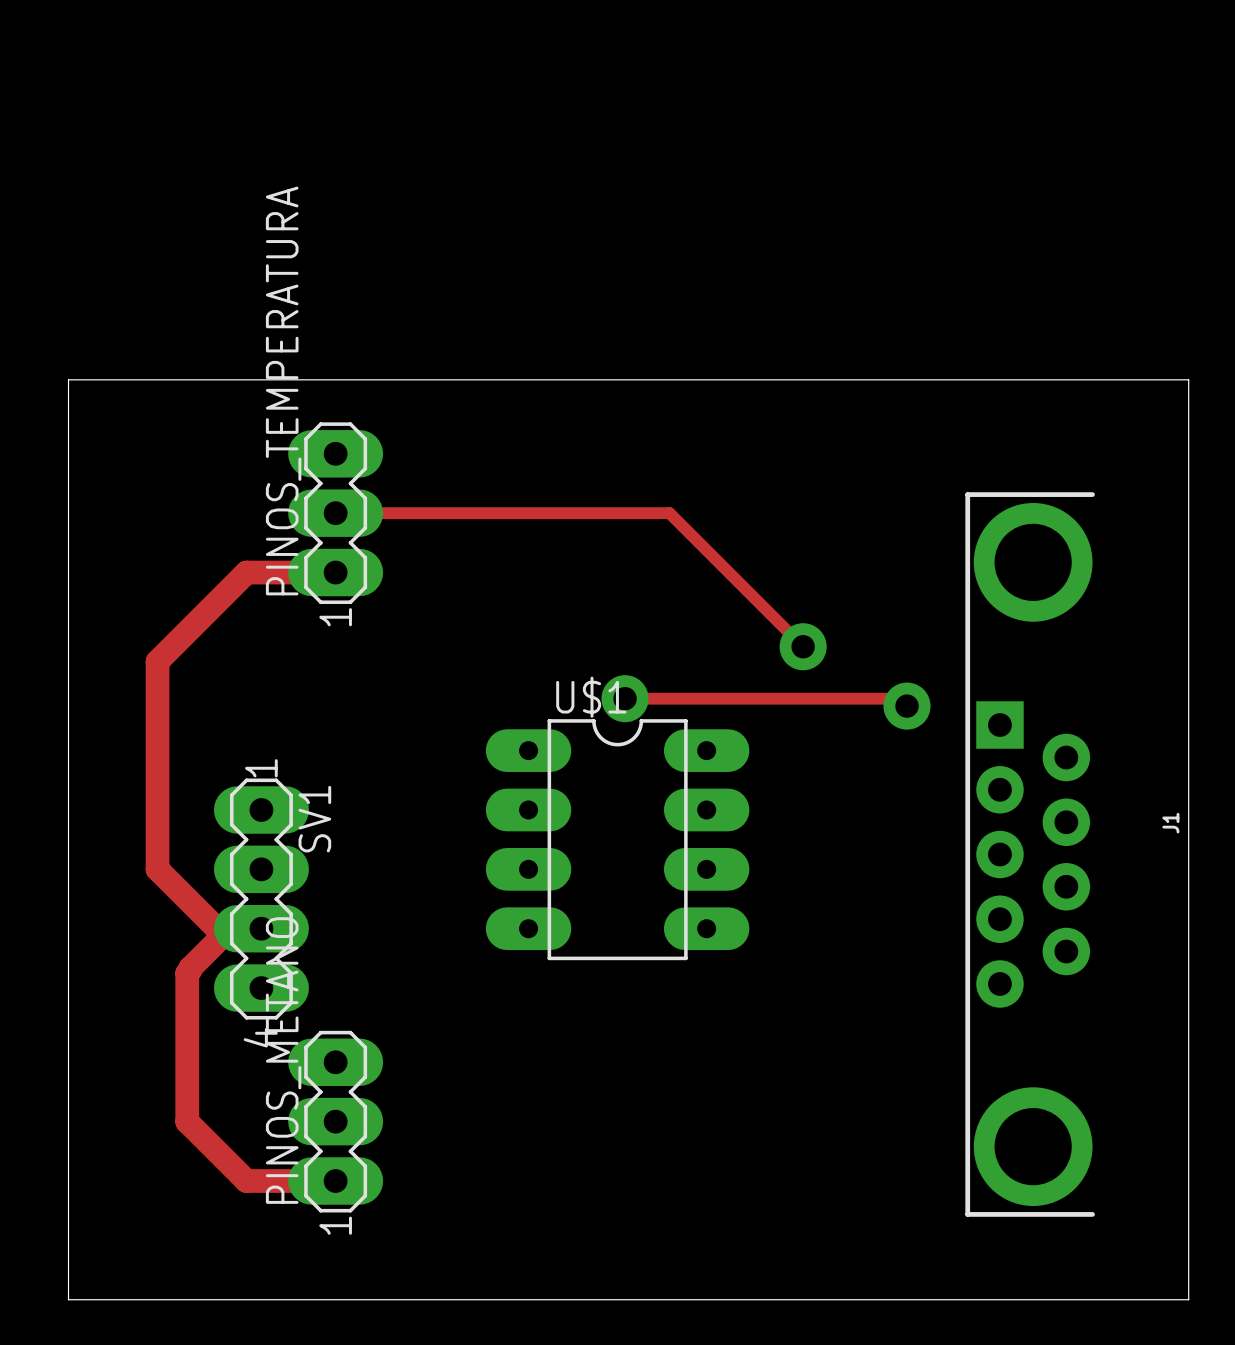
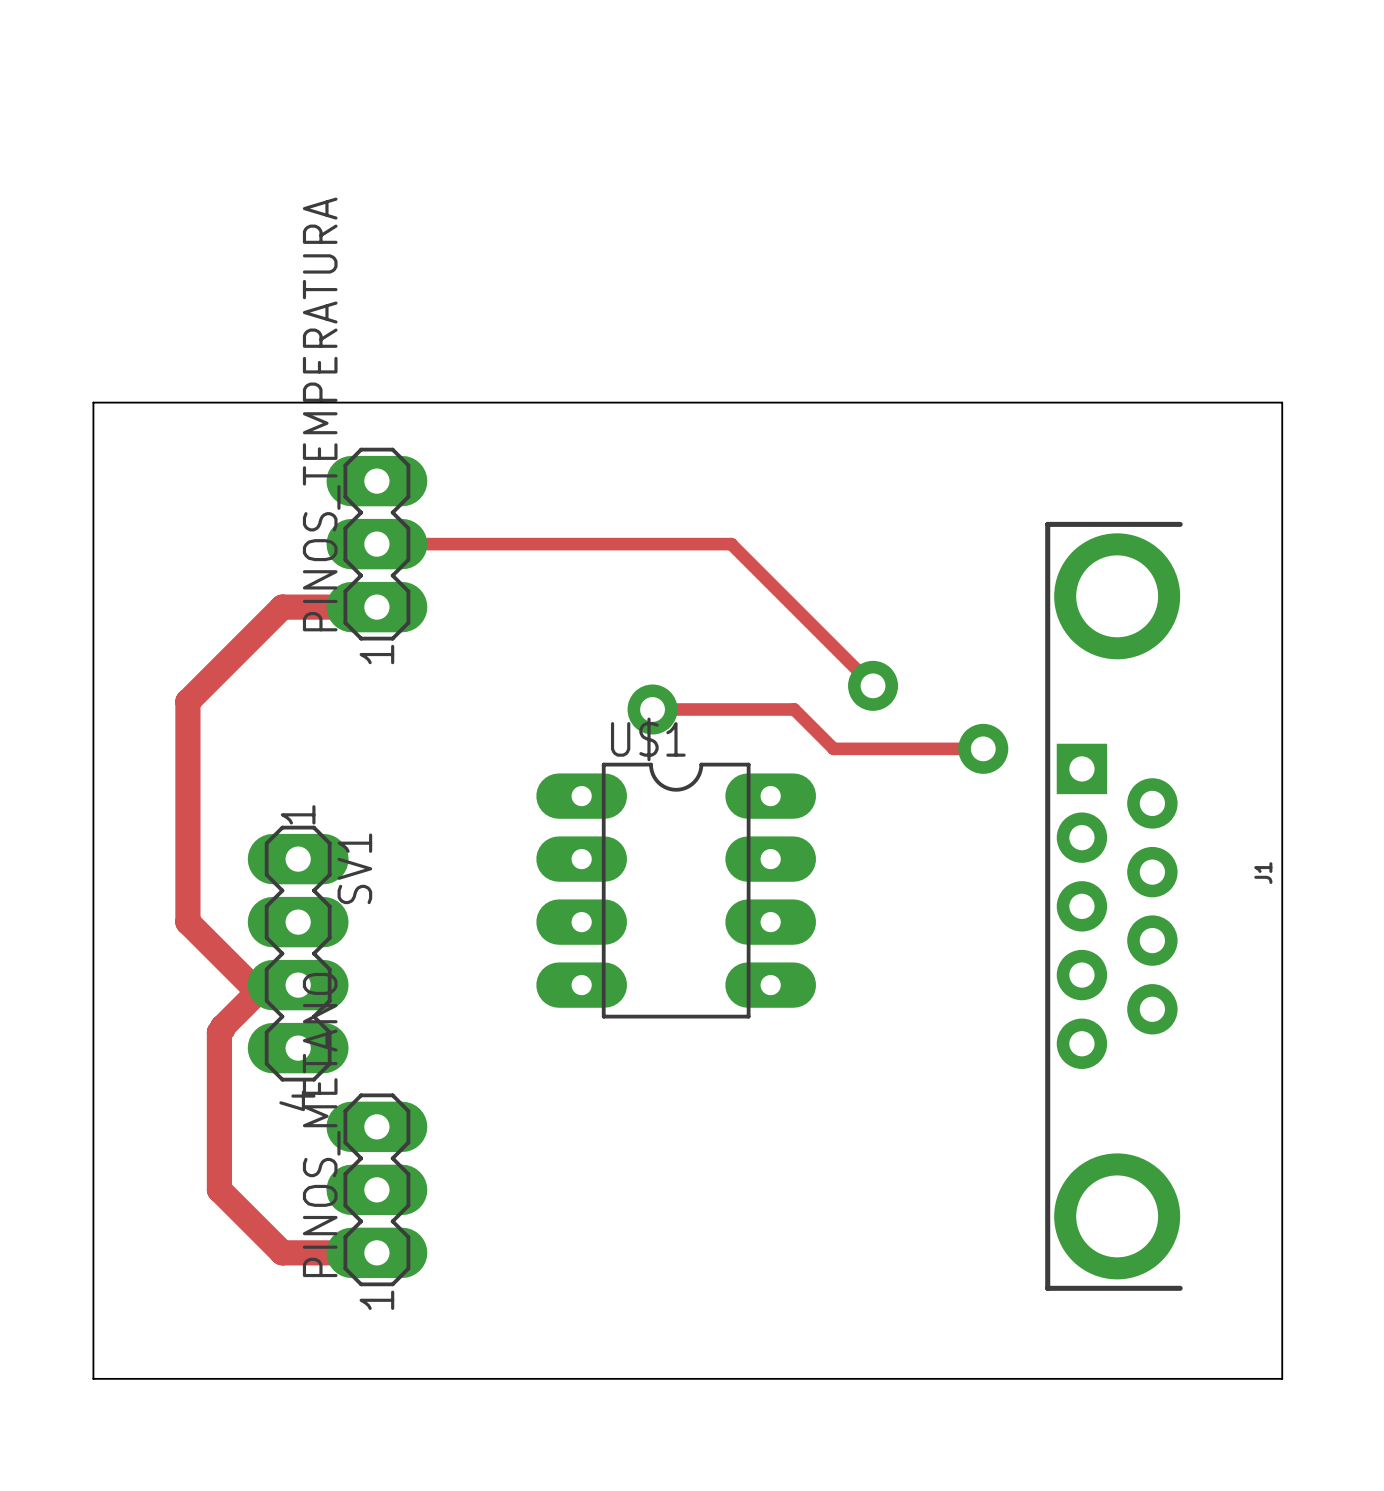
track: (625, 698) (899, 698) (907, 706) -> (652, 709) (794, 709) (833, 748) (983, 748)
via position: (625, 698) -> (652, 709)

